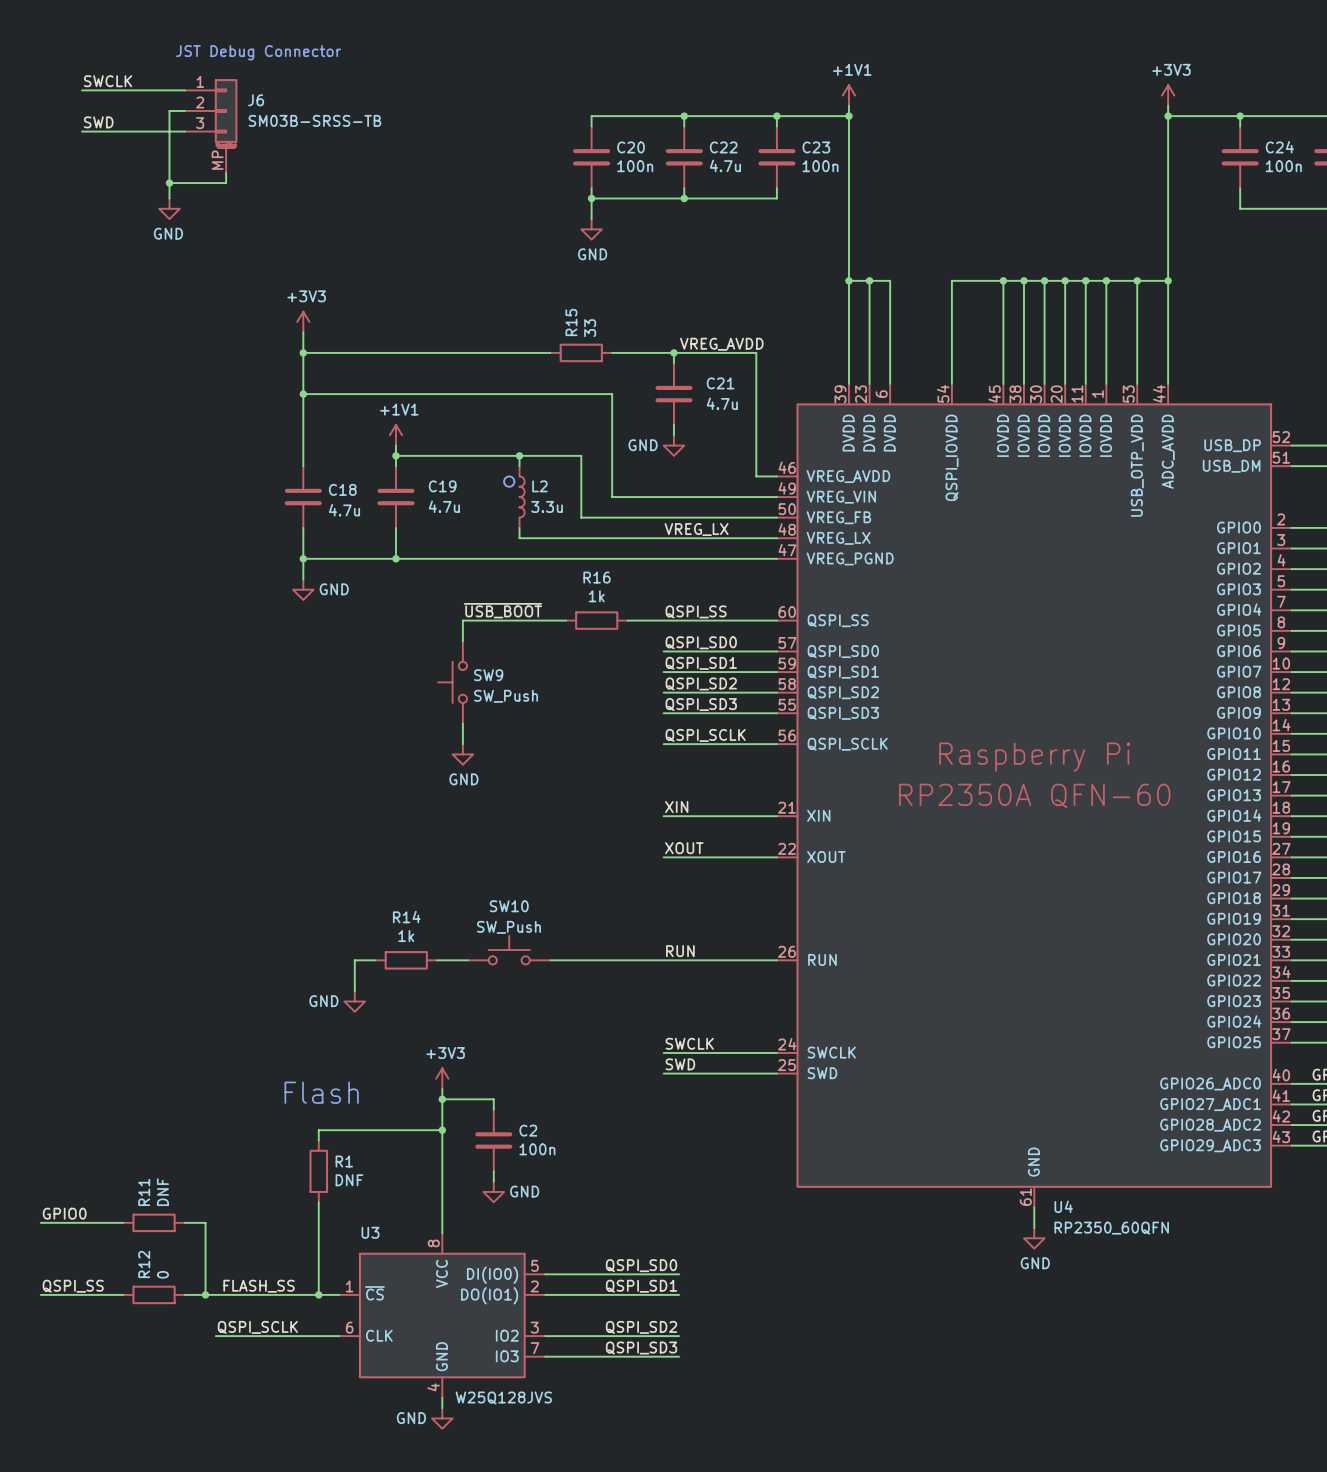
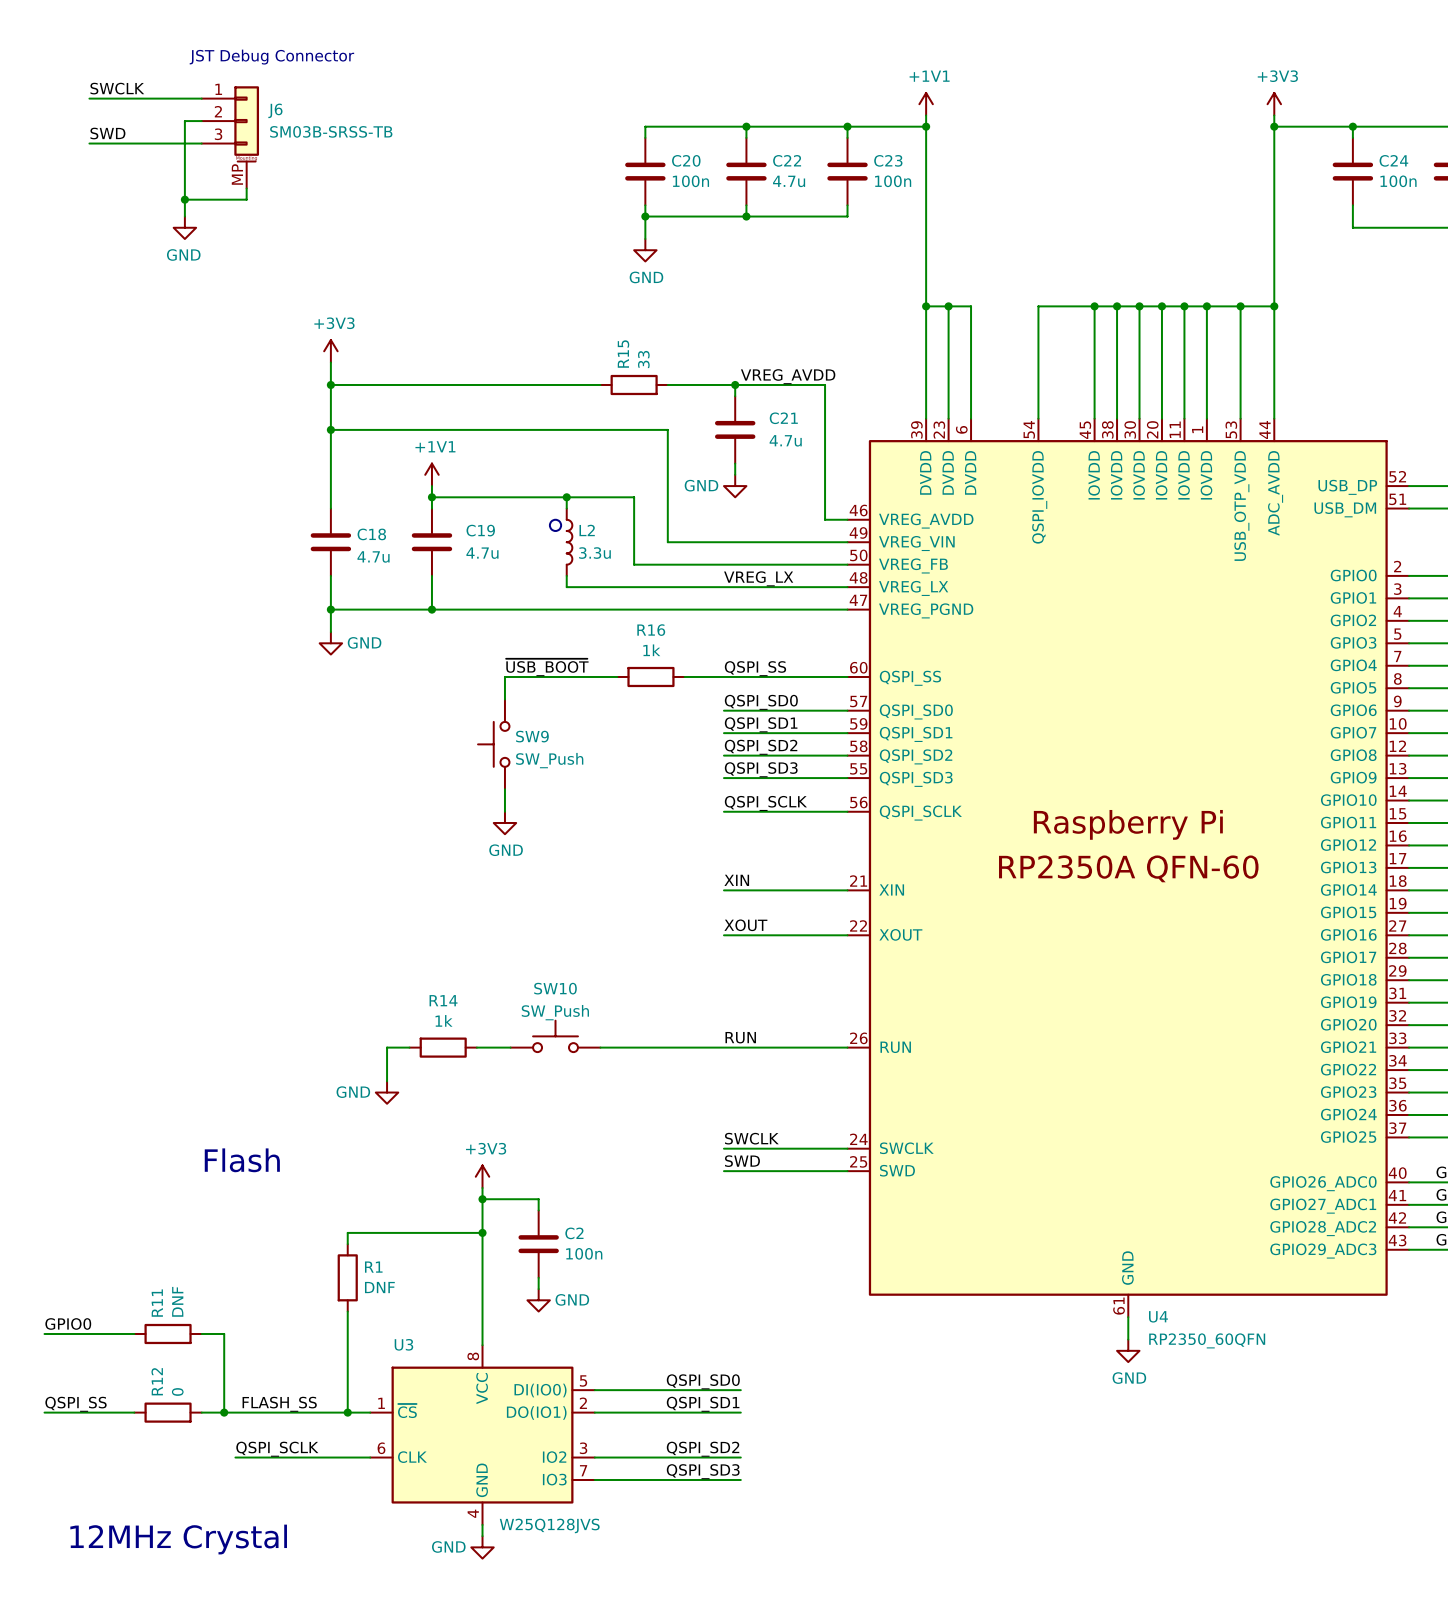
text position: Flash (321, 1092) -> Flash (242, 1160)
text: none -> 12MHz Crystal (178, 1539)

